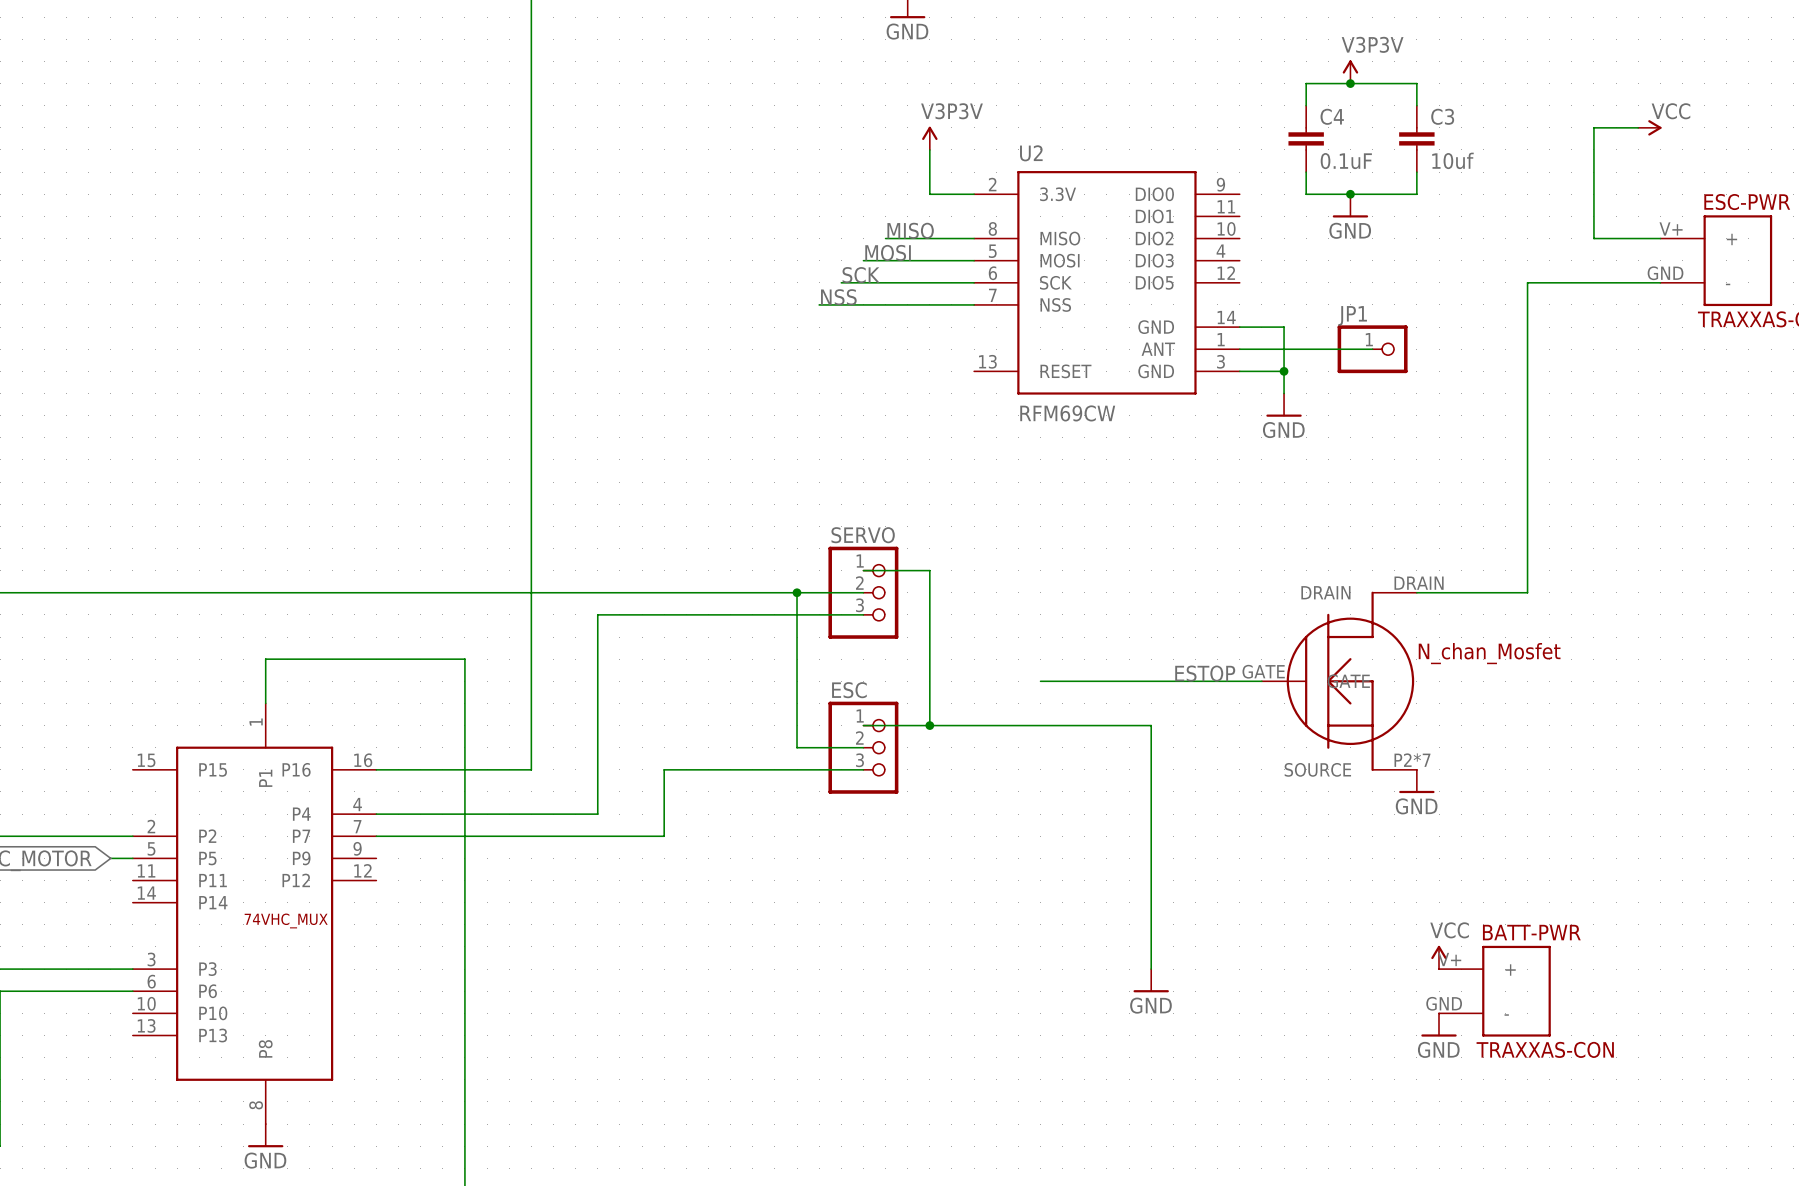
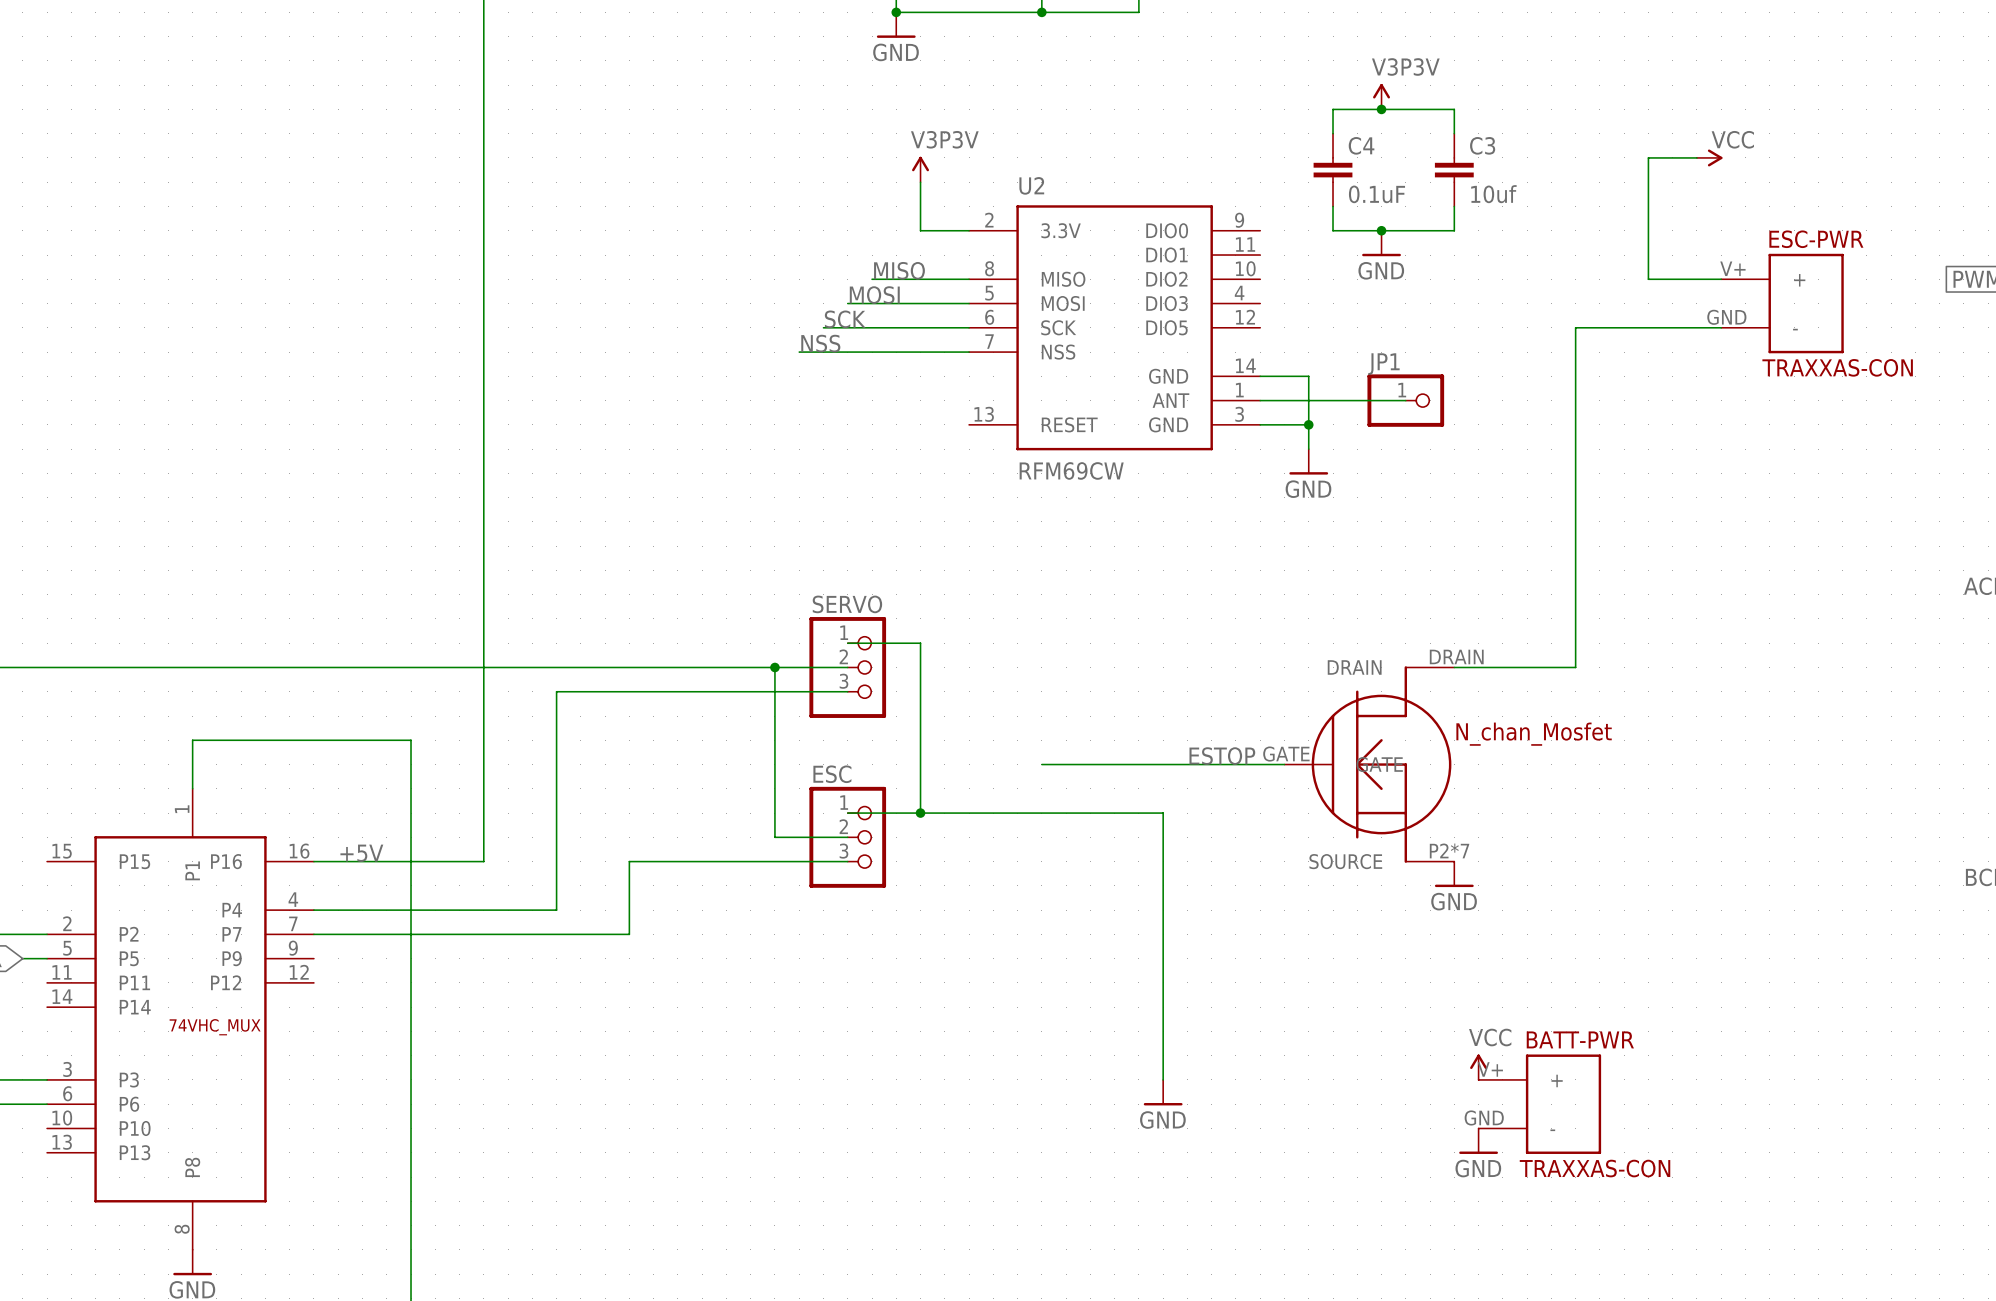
label: none -> +5V (361, 853)

